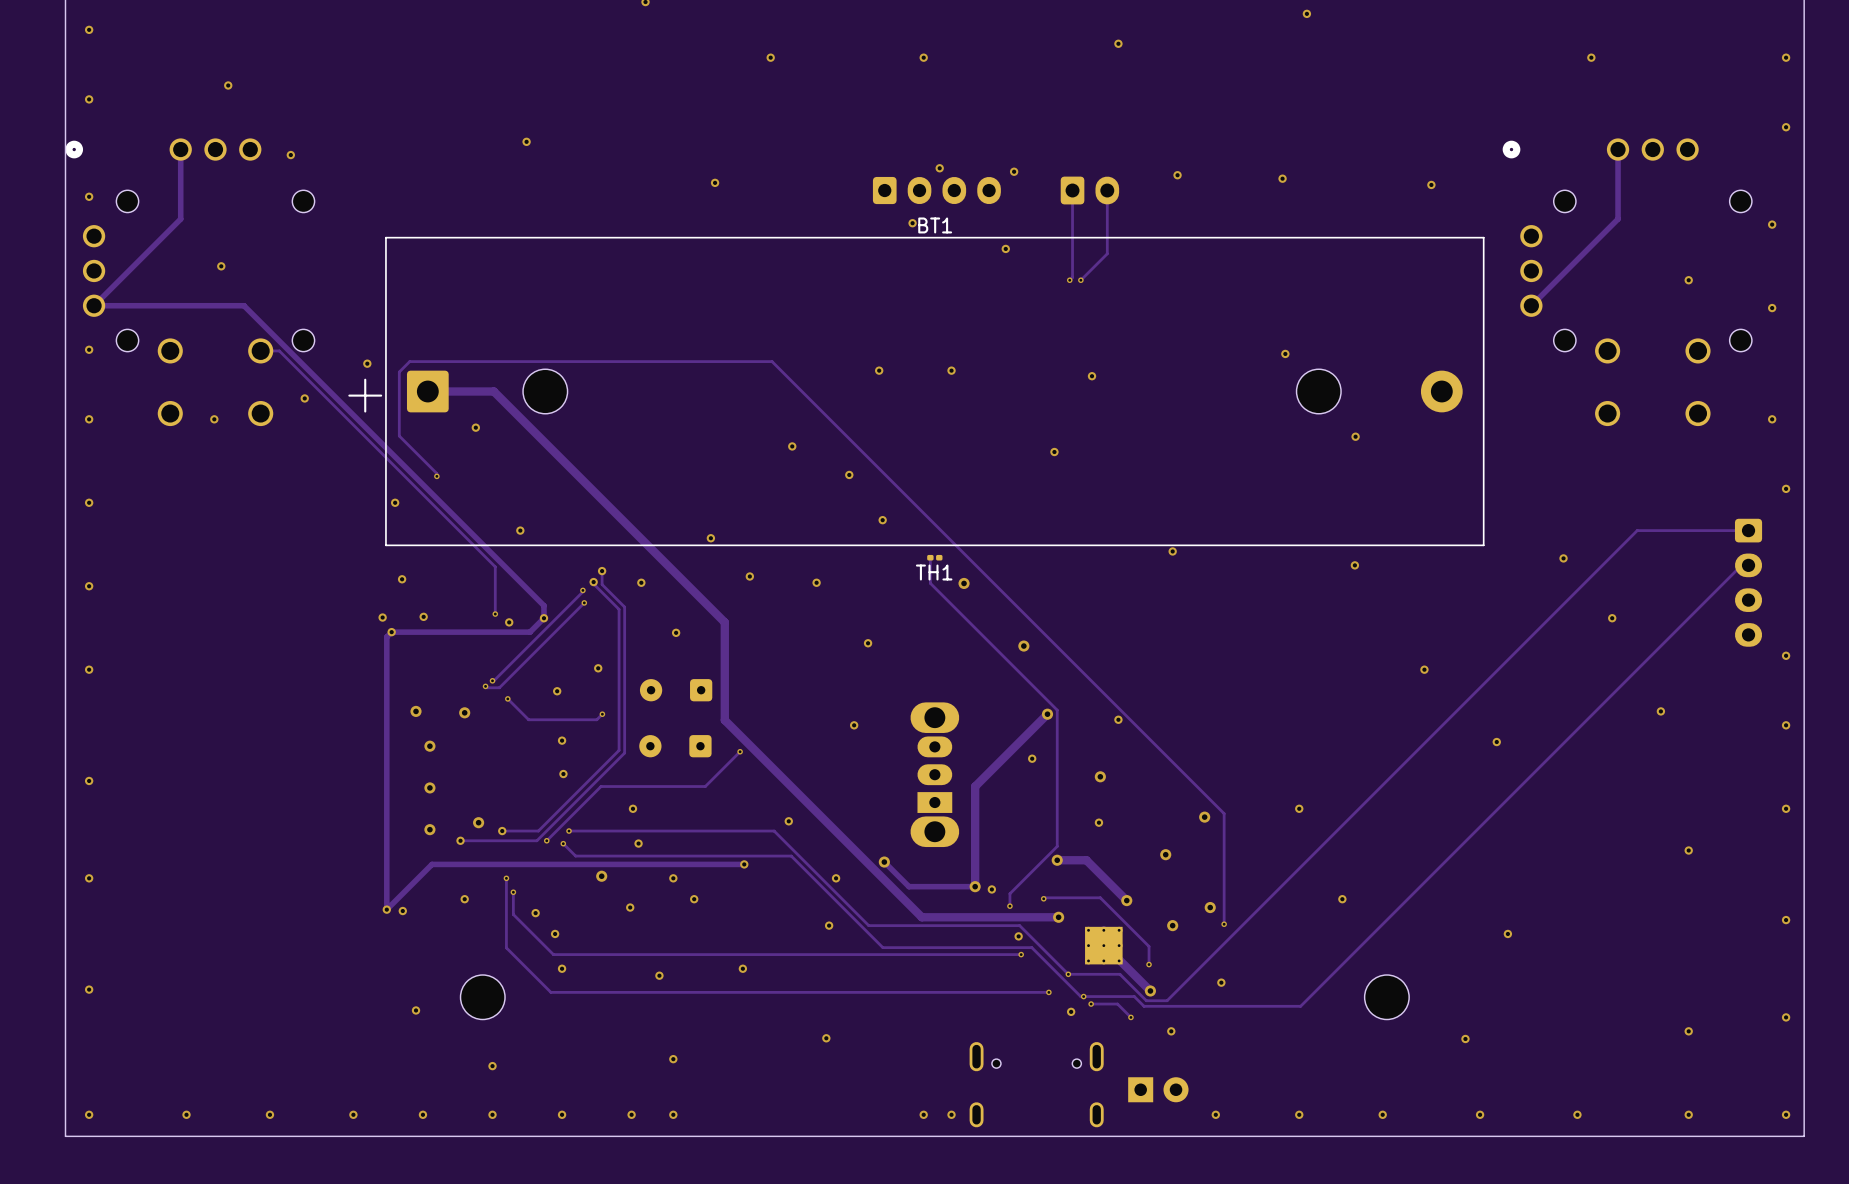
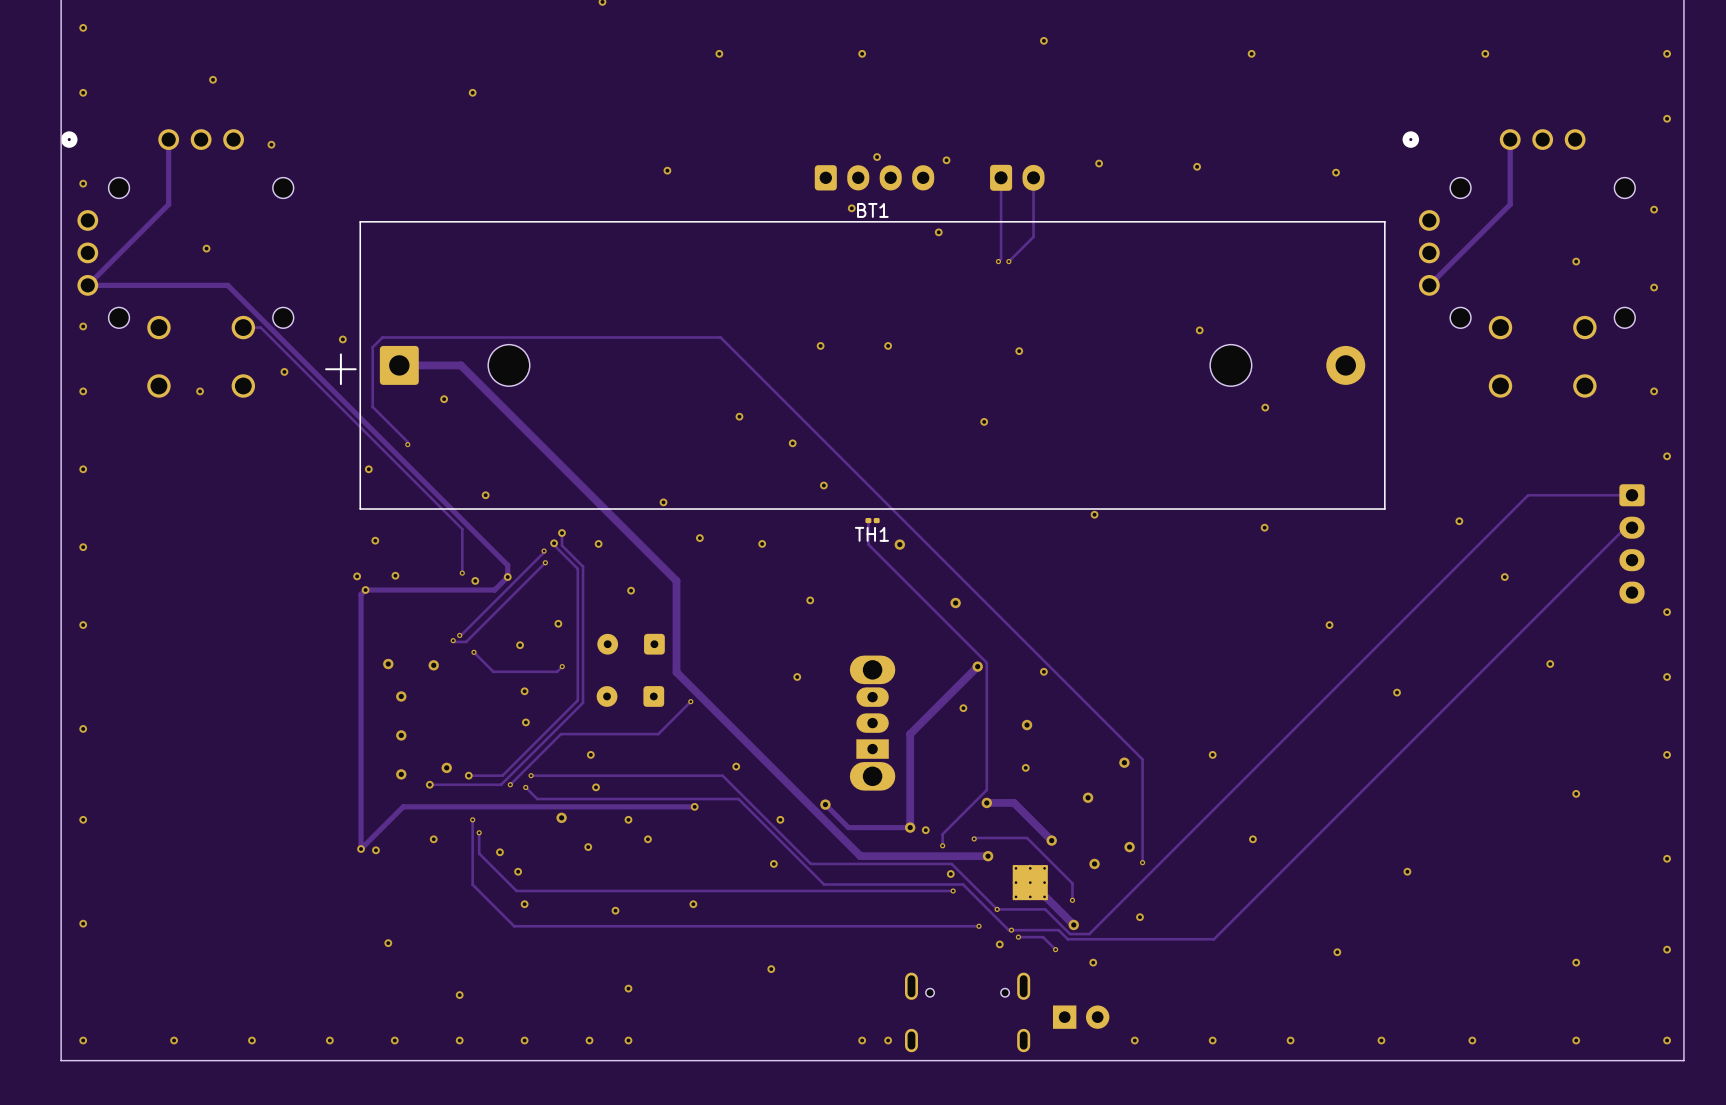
via position: (1306, 13) -> (1251, 53)
via position: (526, 141) -> (472, 92)
part: (482, 997) -> none
part: (1386, 997) -> none
via position: (1465, 1038) -> (1337, 952)

